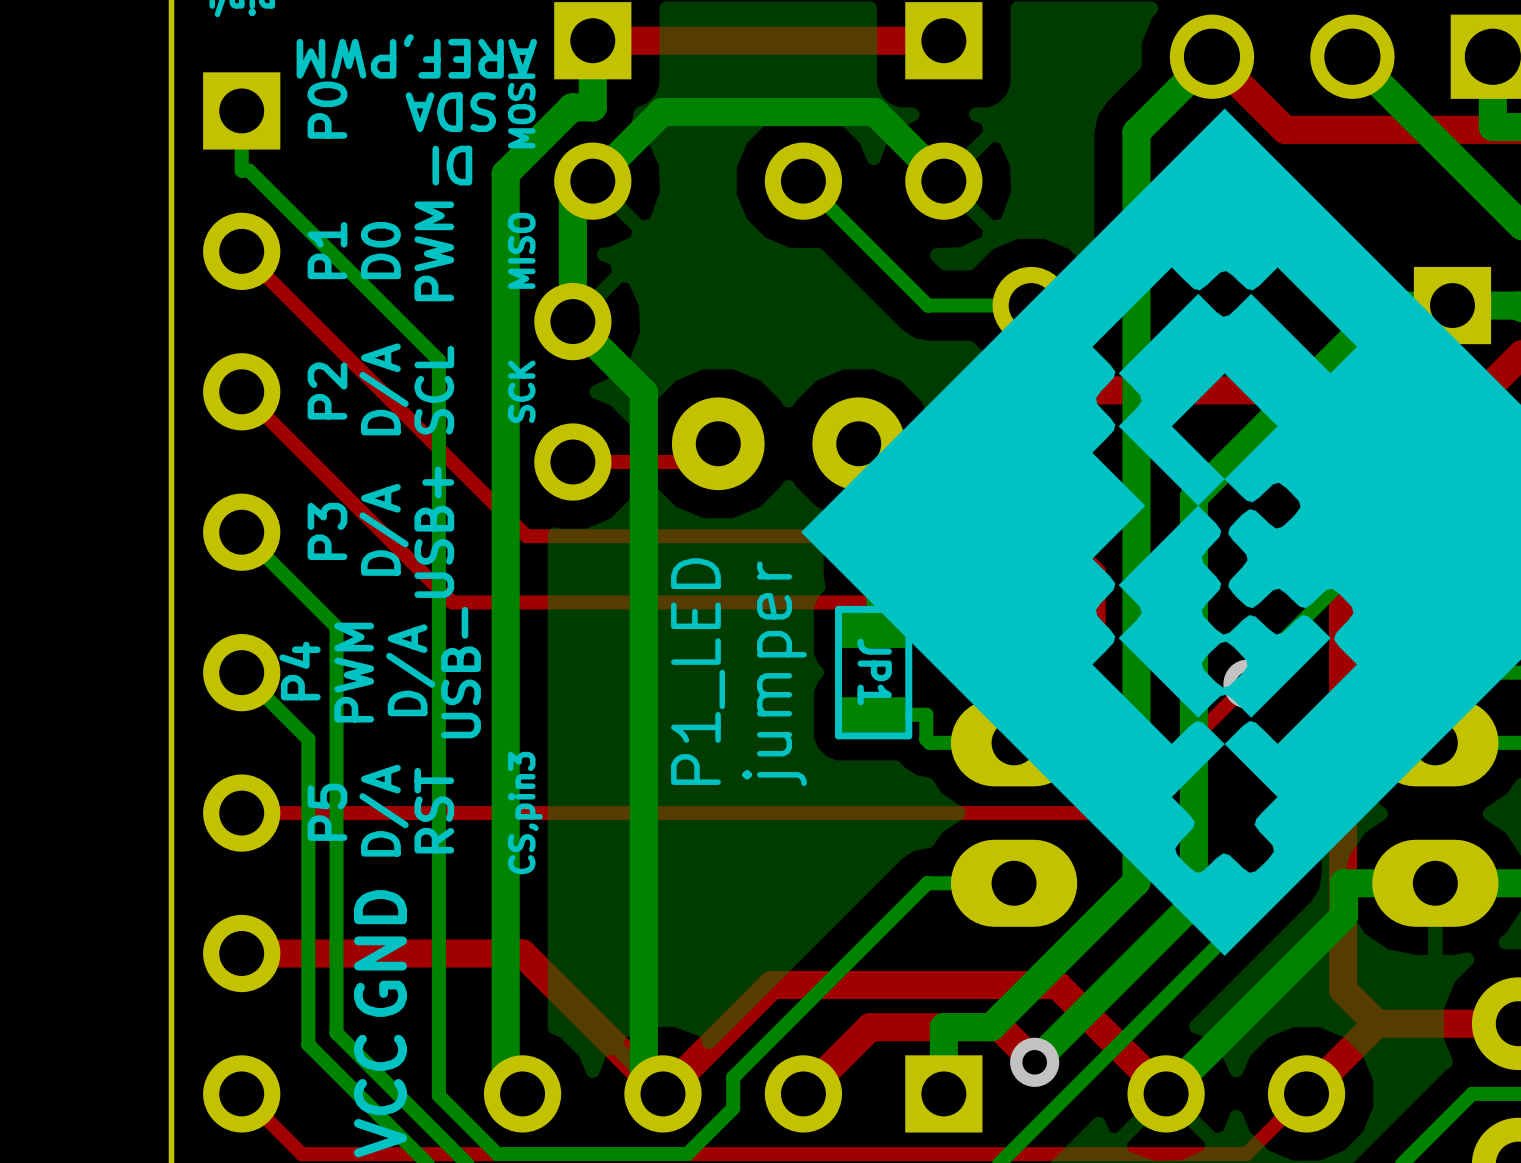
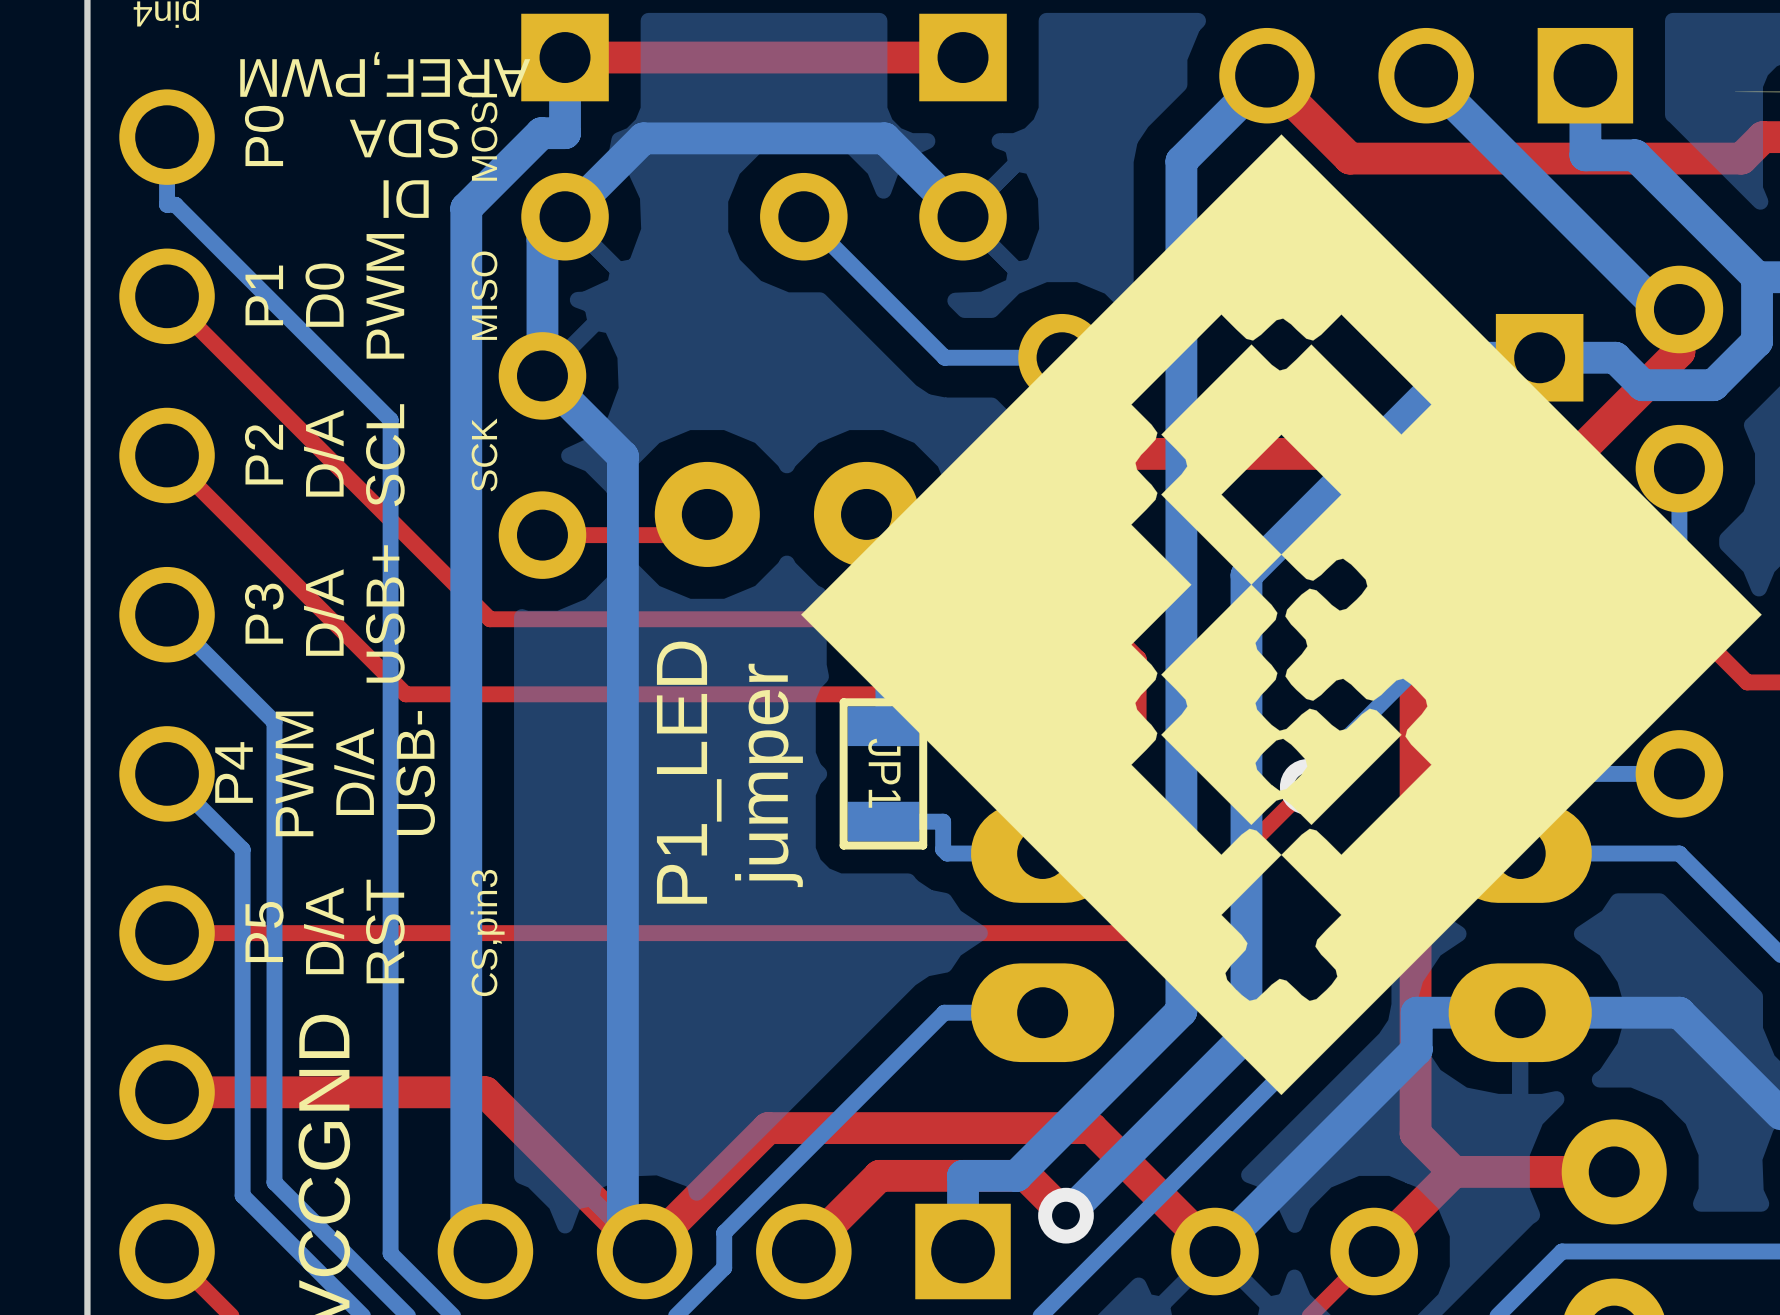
part footprint: [203, 72, 281, 1133] -> [119, 89, 215, 1300]
part footprint: [483, 1055, 983, 1133] -> [437, 1203, 1011, 1300]

